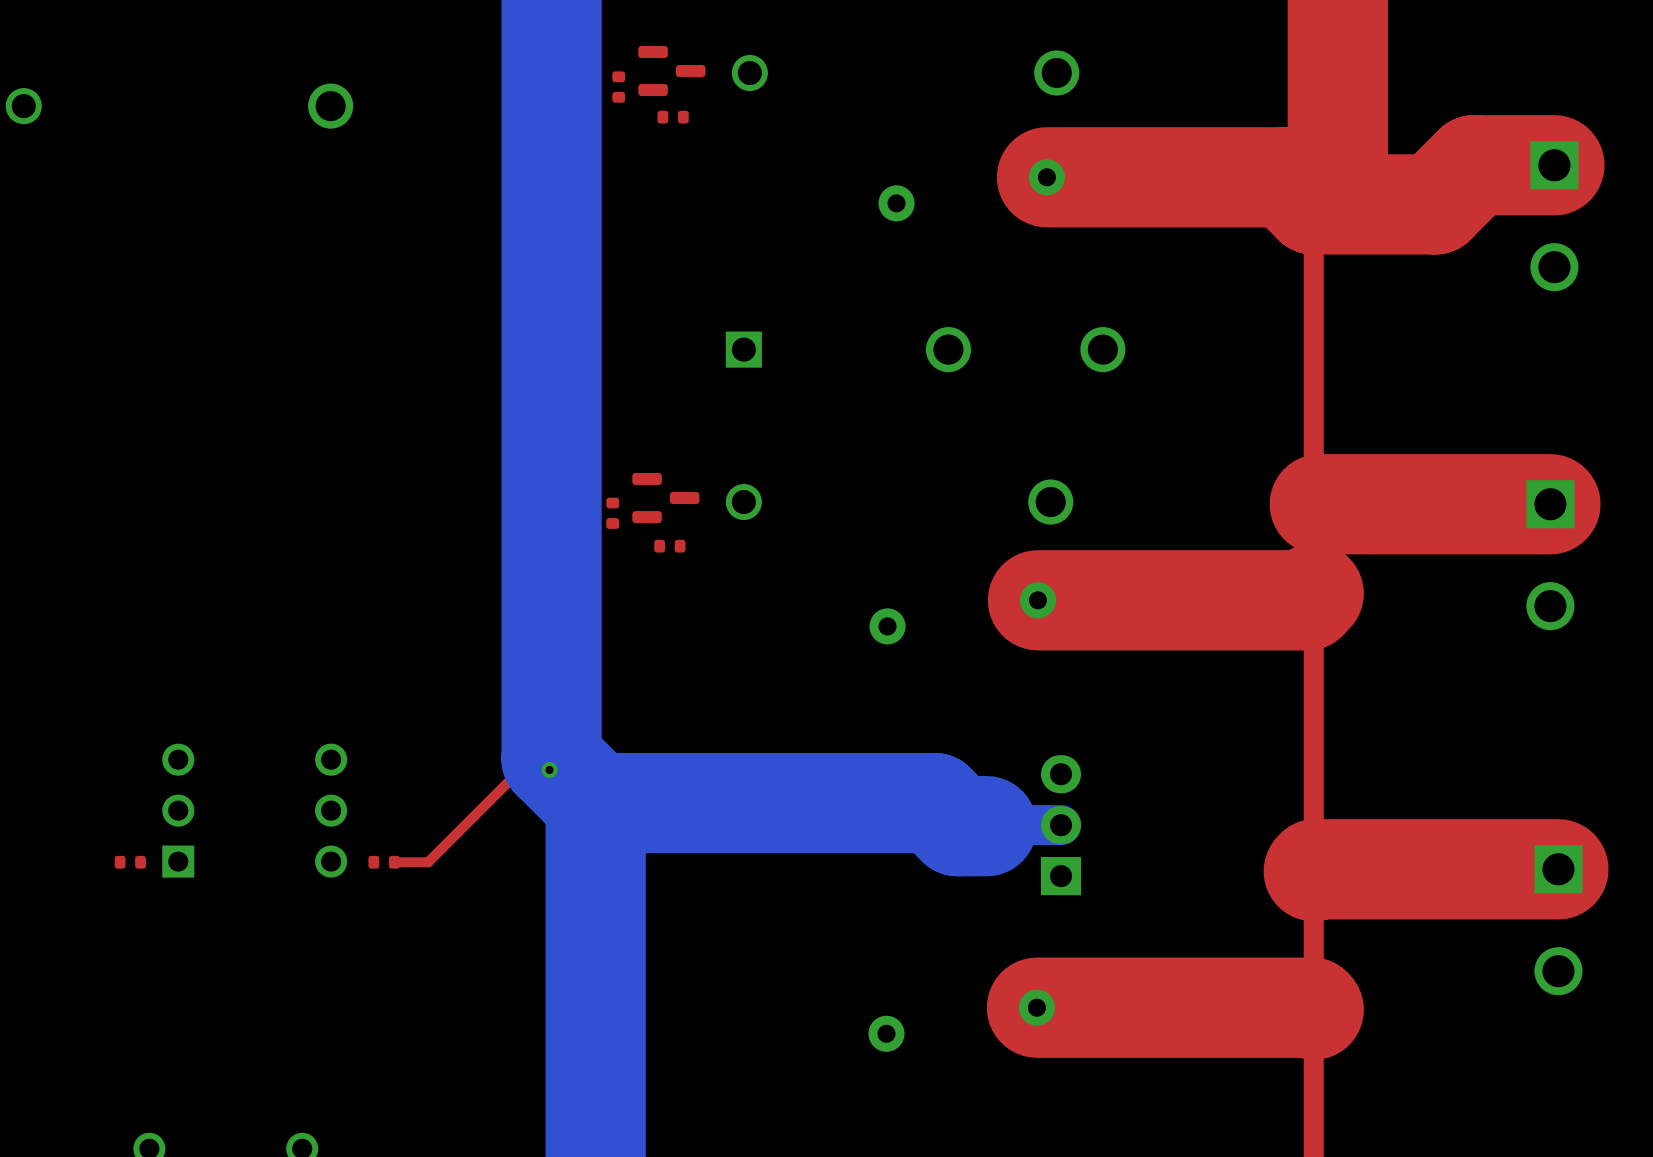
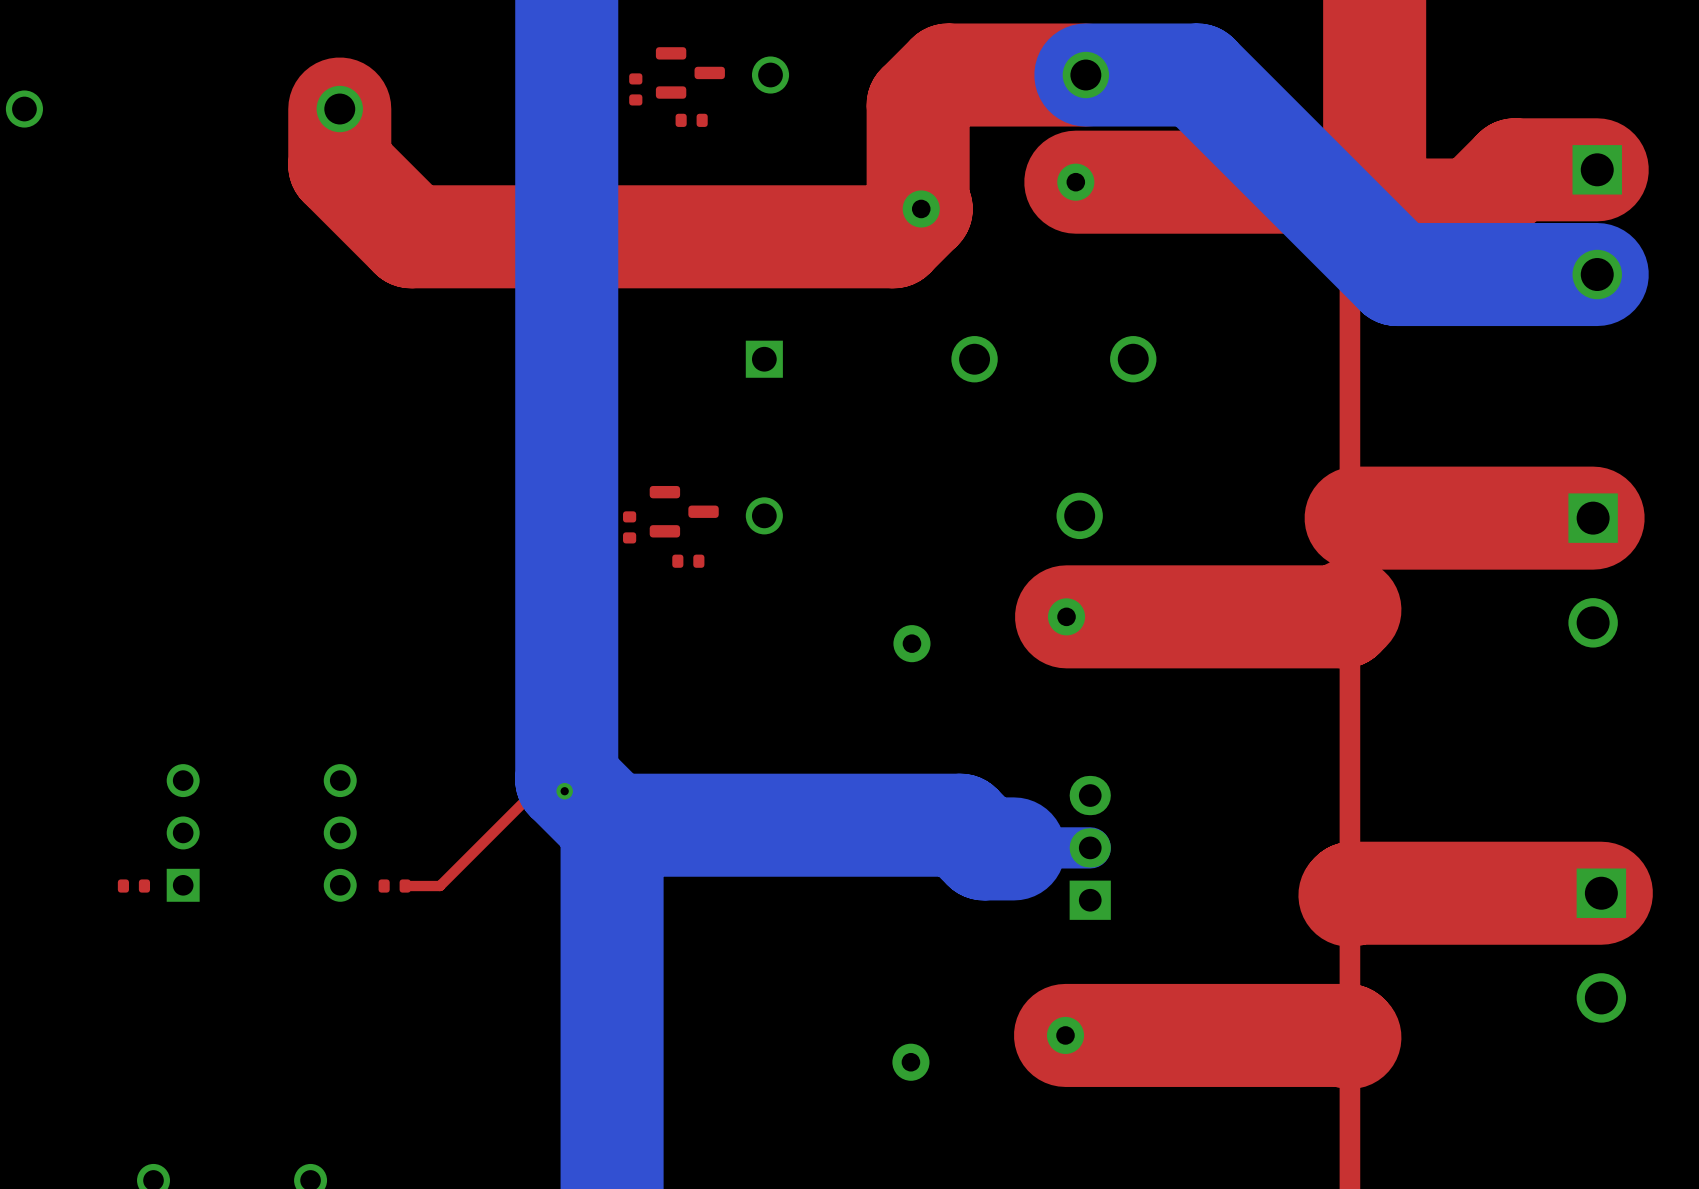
top track: none -> (1085, 75) (948, 75) (918, 104) (918, 205) (921, 208) (893, 236) (411, 236) (339, 165) (339, 109)
bottom track: none -> (1085, 75) (1197, 75) (1396, 274) (1597, 274)

